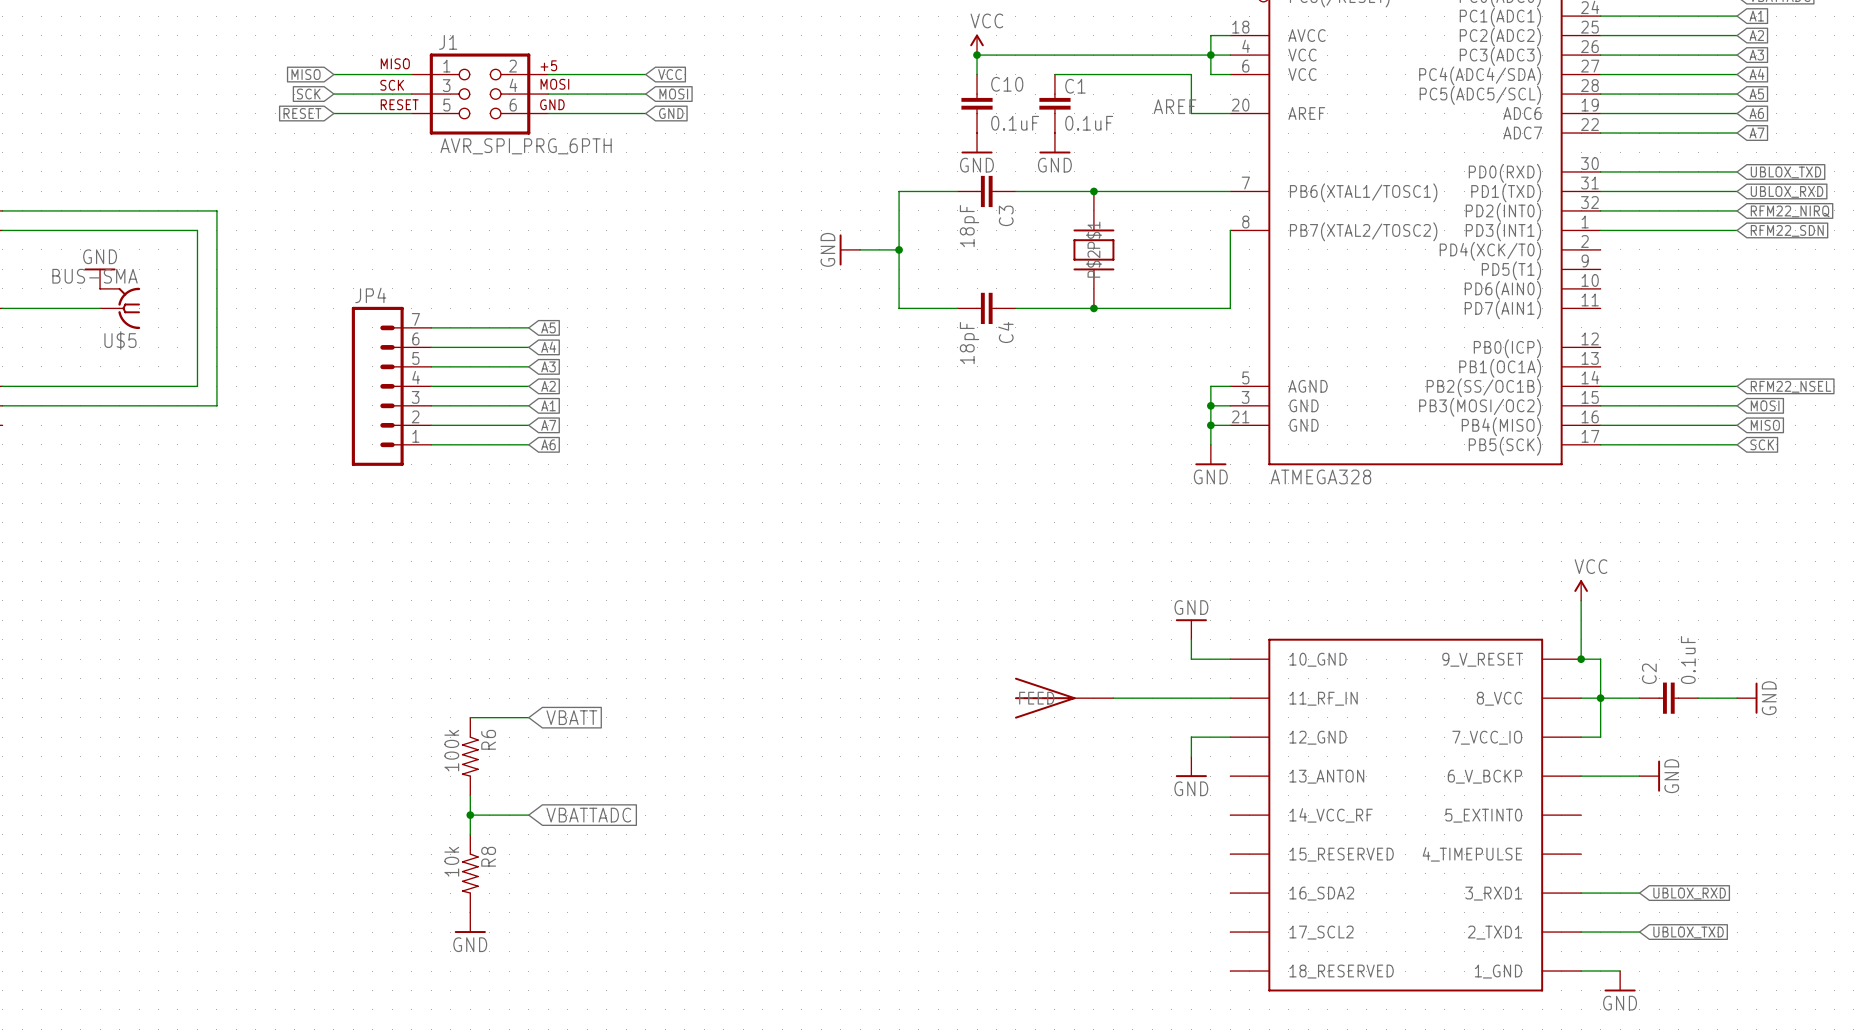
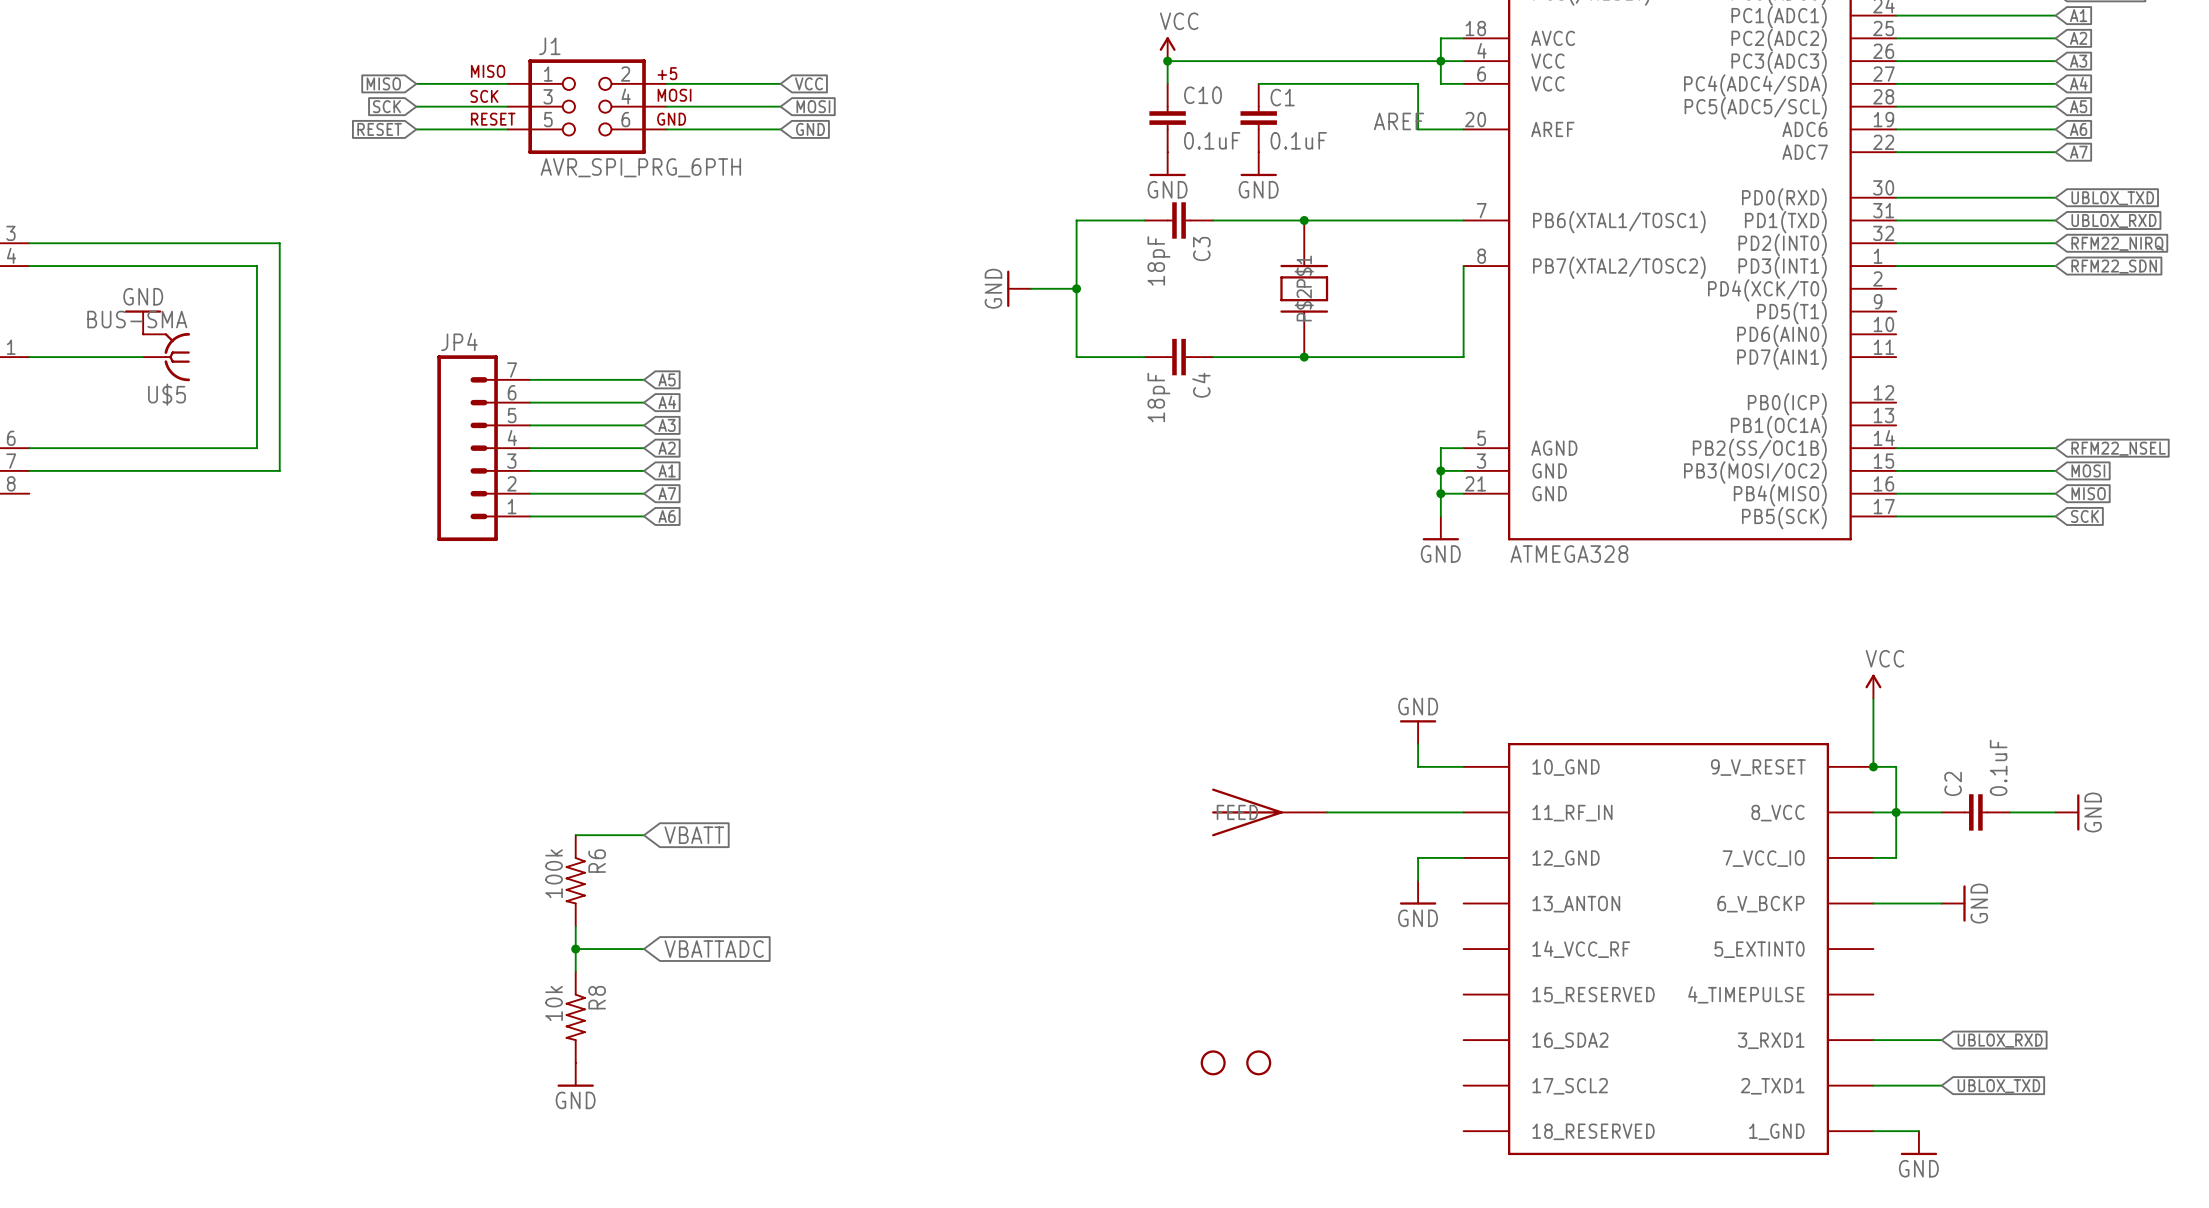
part: none -> (1213, 1062)
part: none -> (1258, 1062)

